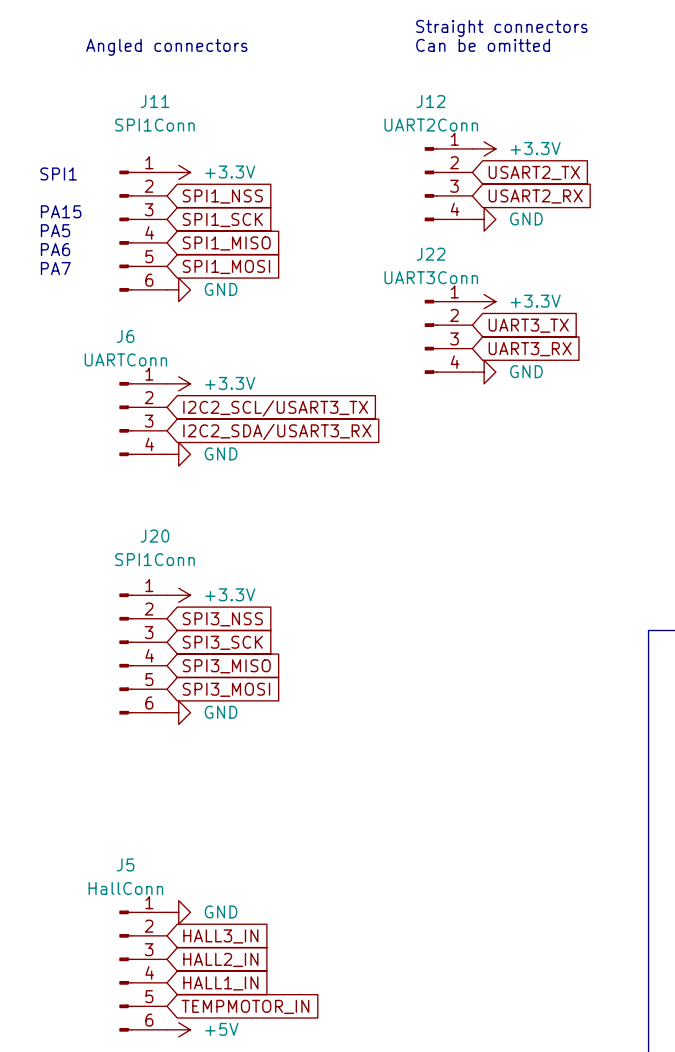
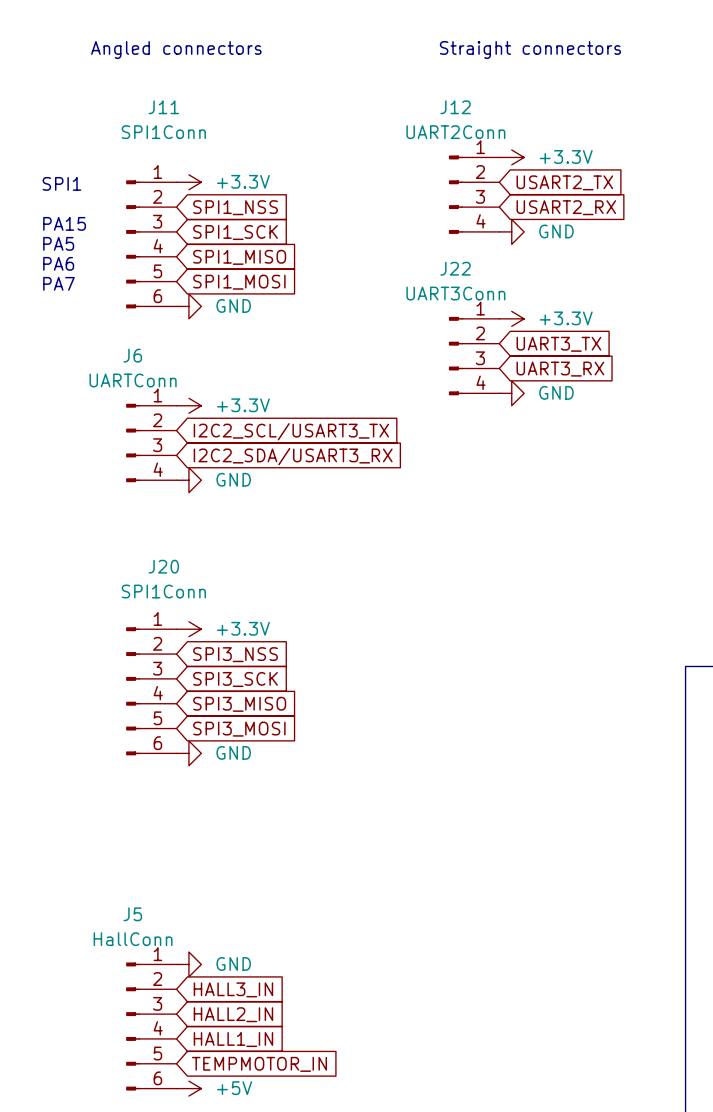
text: Straight connectors (501, 28) -> none
text: Can be omitted (483, 45) -> Straight connectors (530, 50)

